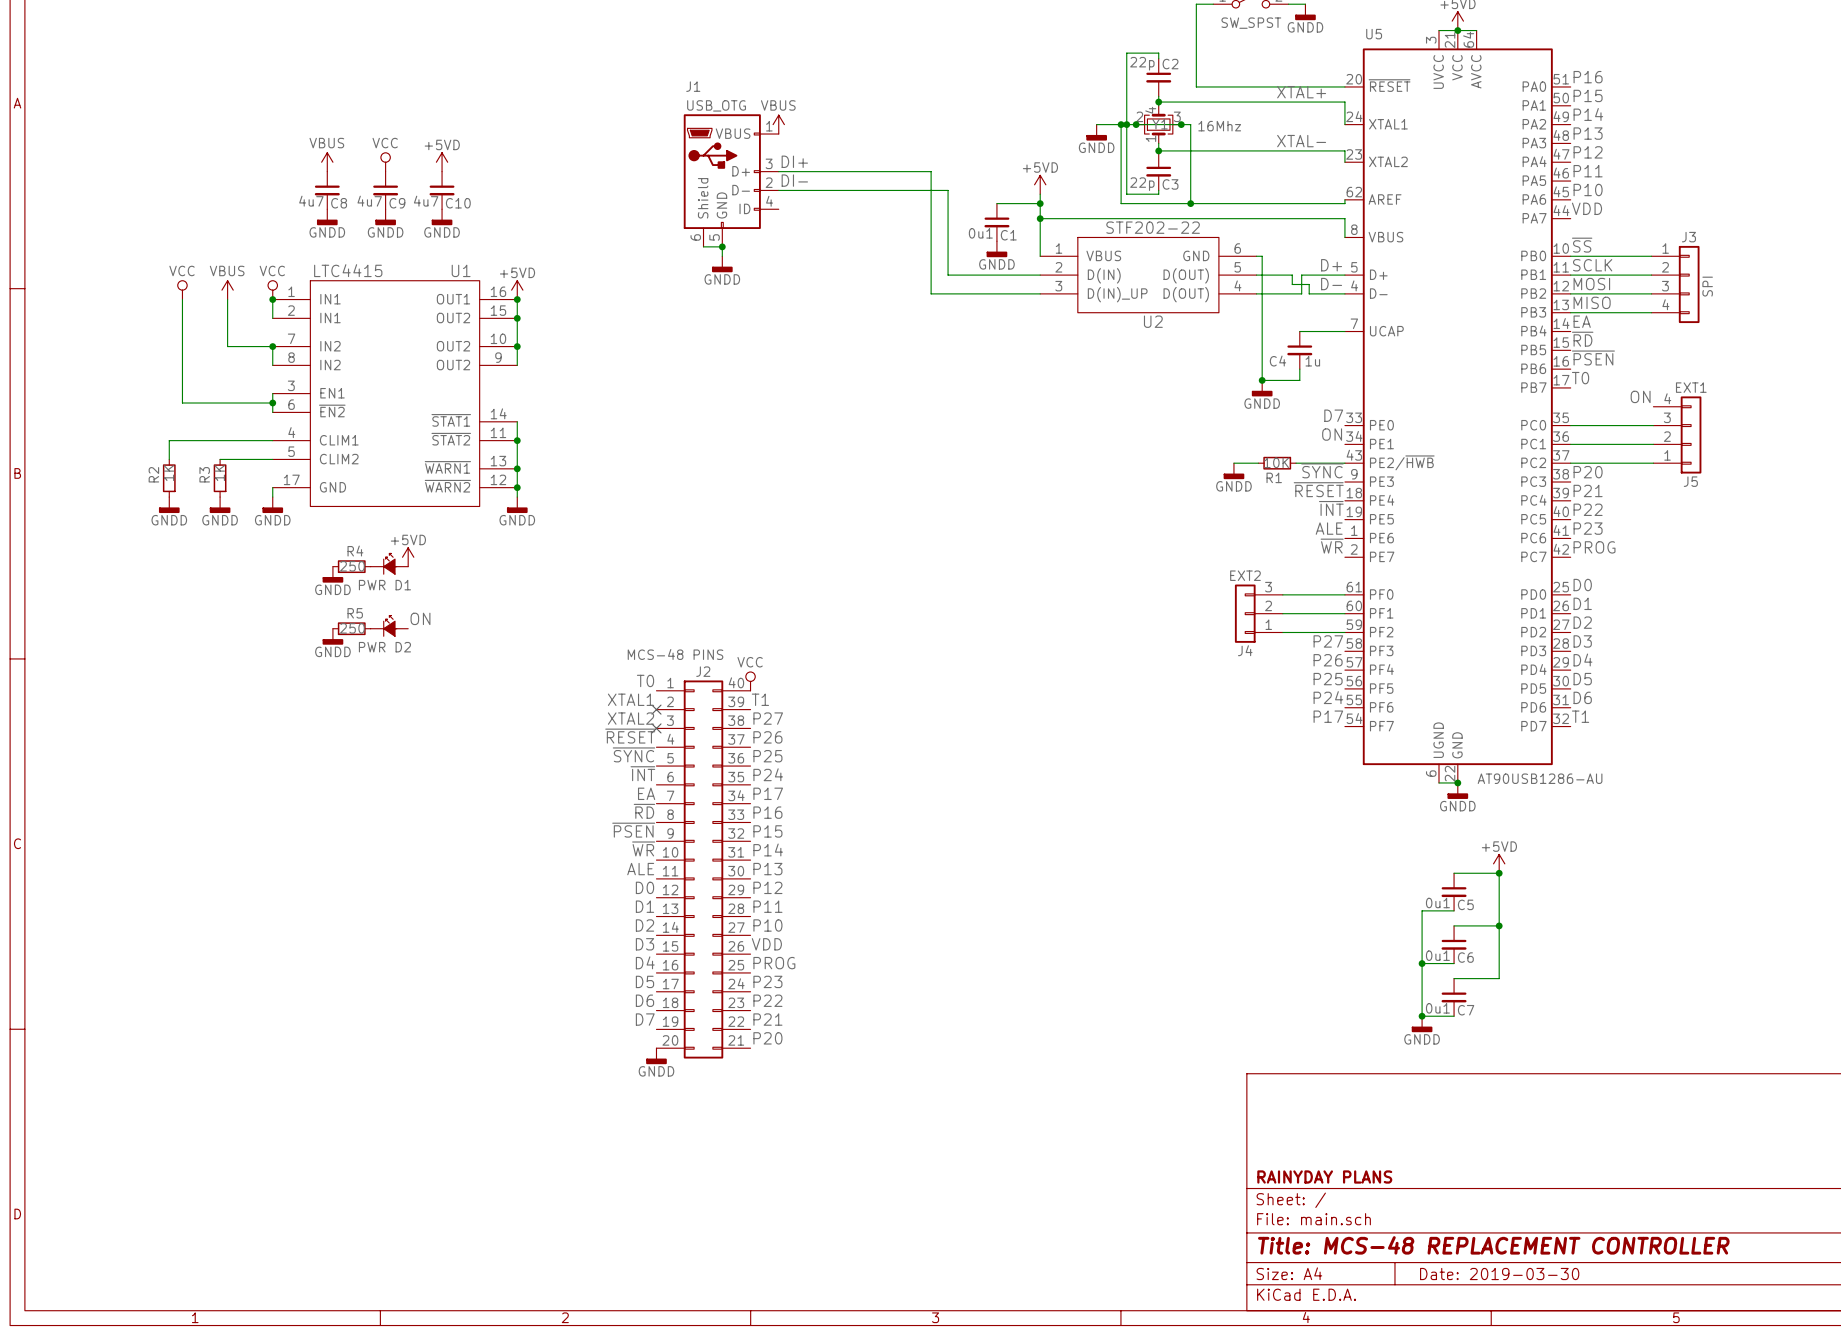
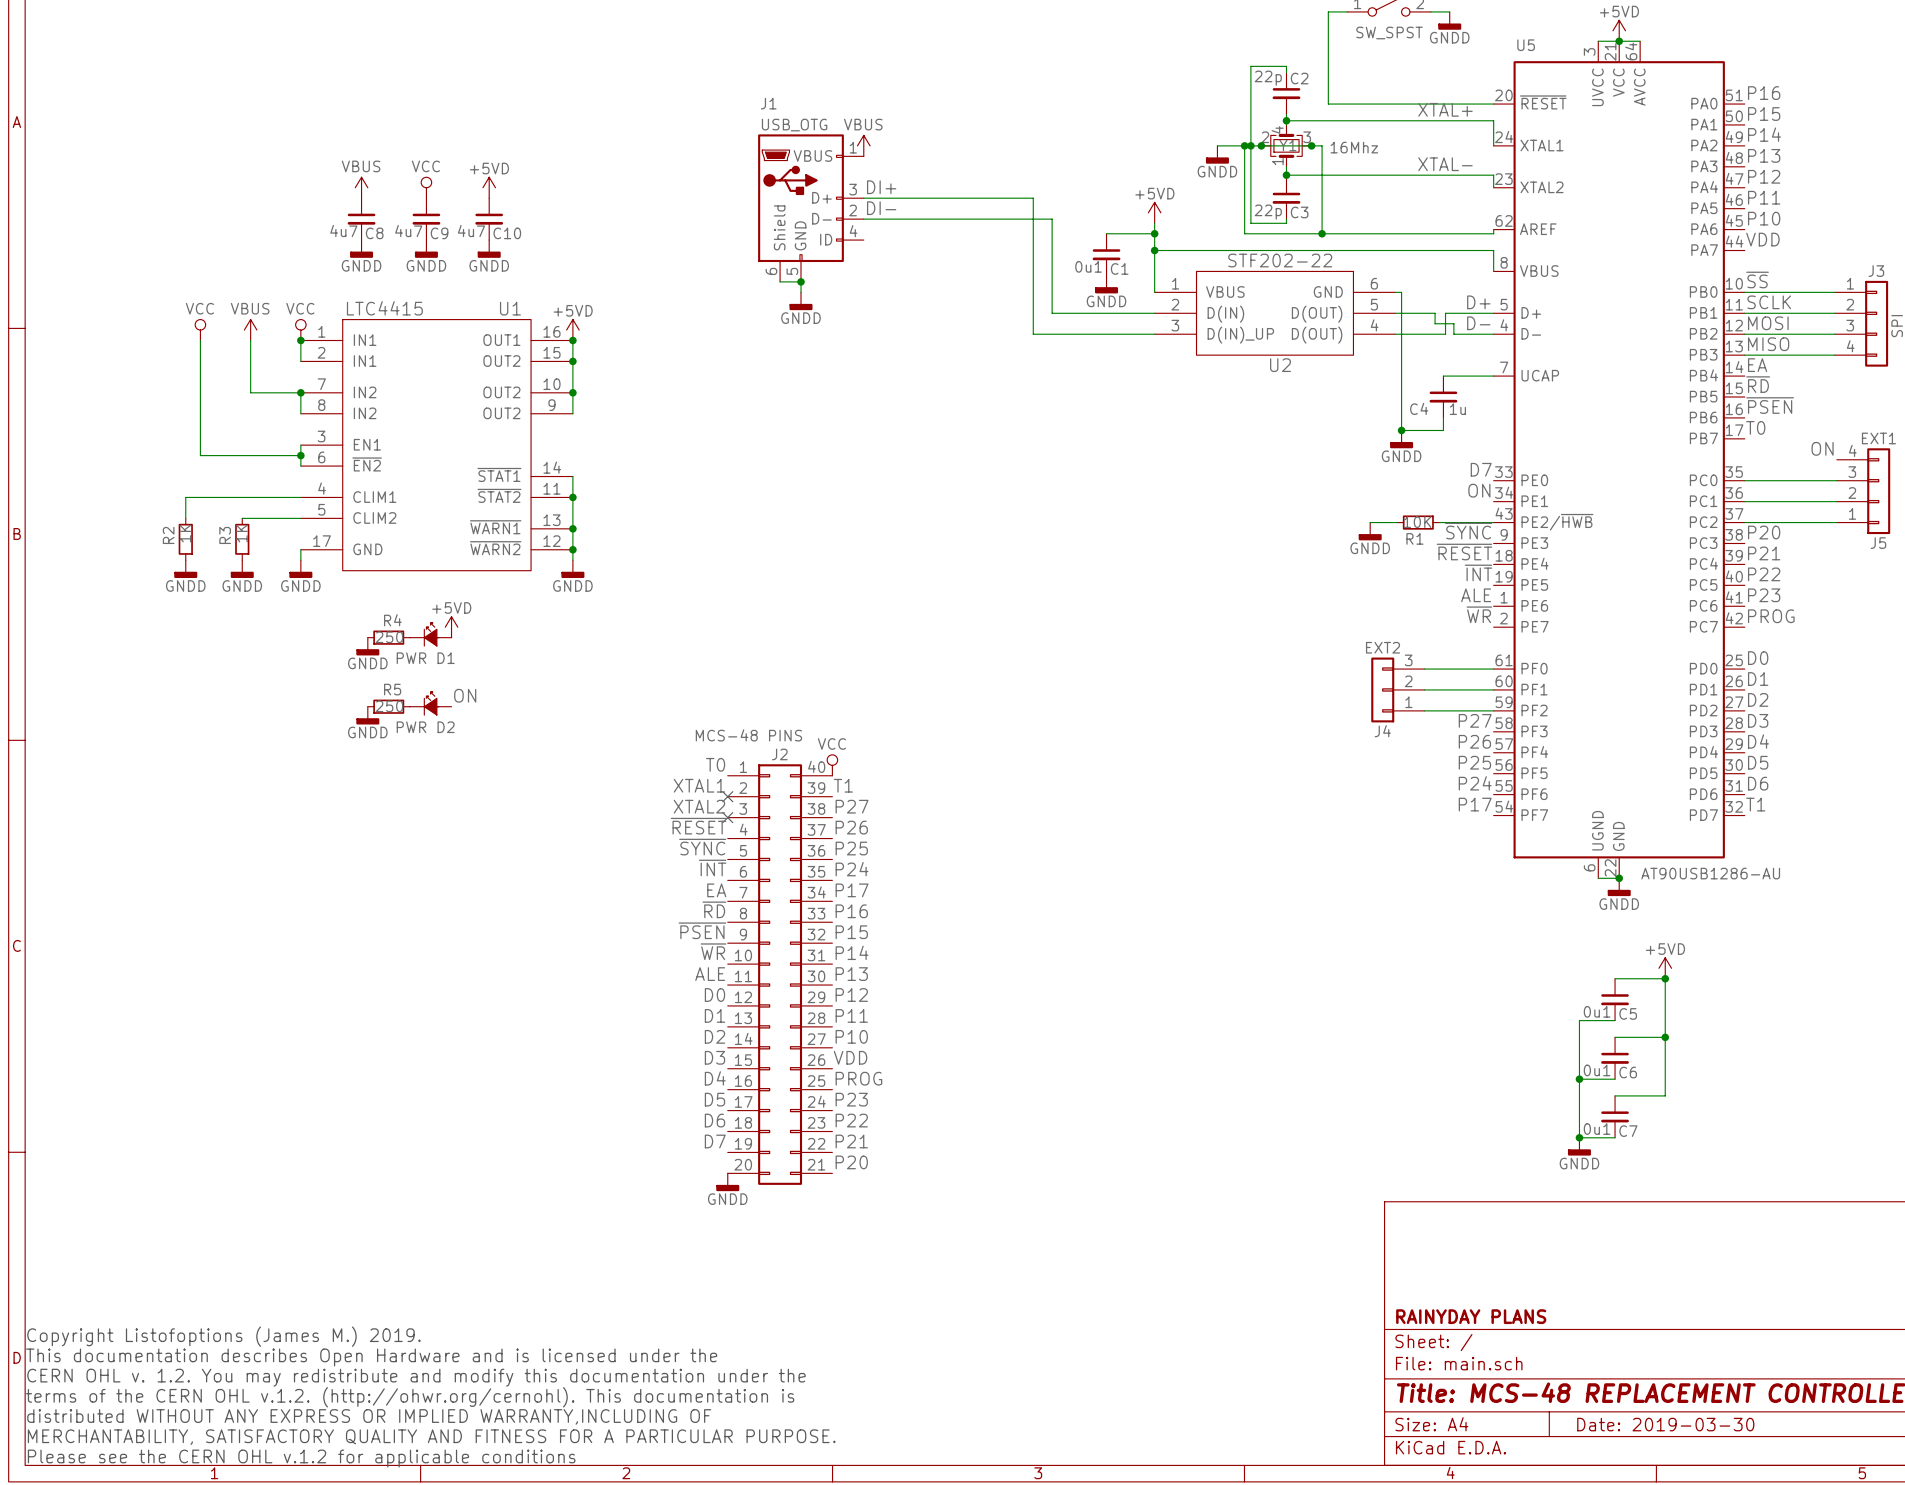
text: none -> Copyright Listofoptions (James M.) 2019. (223, 1336)
text: none -> This documentation describes Open Hardware and is licensed under the (371, 1357)
text: none -> CERN OHL v. 1.2. You may redistribute and modify this documentation under the (416, 1377)
text: none -> terms of the CERN OHL v.1.2. (http://ohwr.org/cernohl). This documentation is (410, 1397)
text: none -> distributed WITHOUT ANY EXPRESS OR IMPLIED WARRANTY,INCLUDING OF (369, 1416)
text: none -> MERCHANTABILITY, SATISFACTORY QUALITY AND FITNESS FOR A PARTICULAR PURPOSE. (431, 1437)
text: none -> Please see the CERN OHL v.1.2 for applicable conditions (301, 1458)

